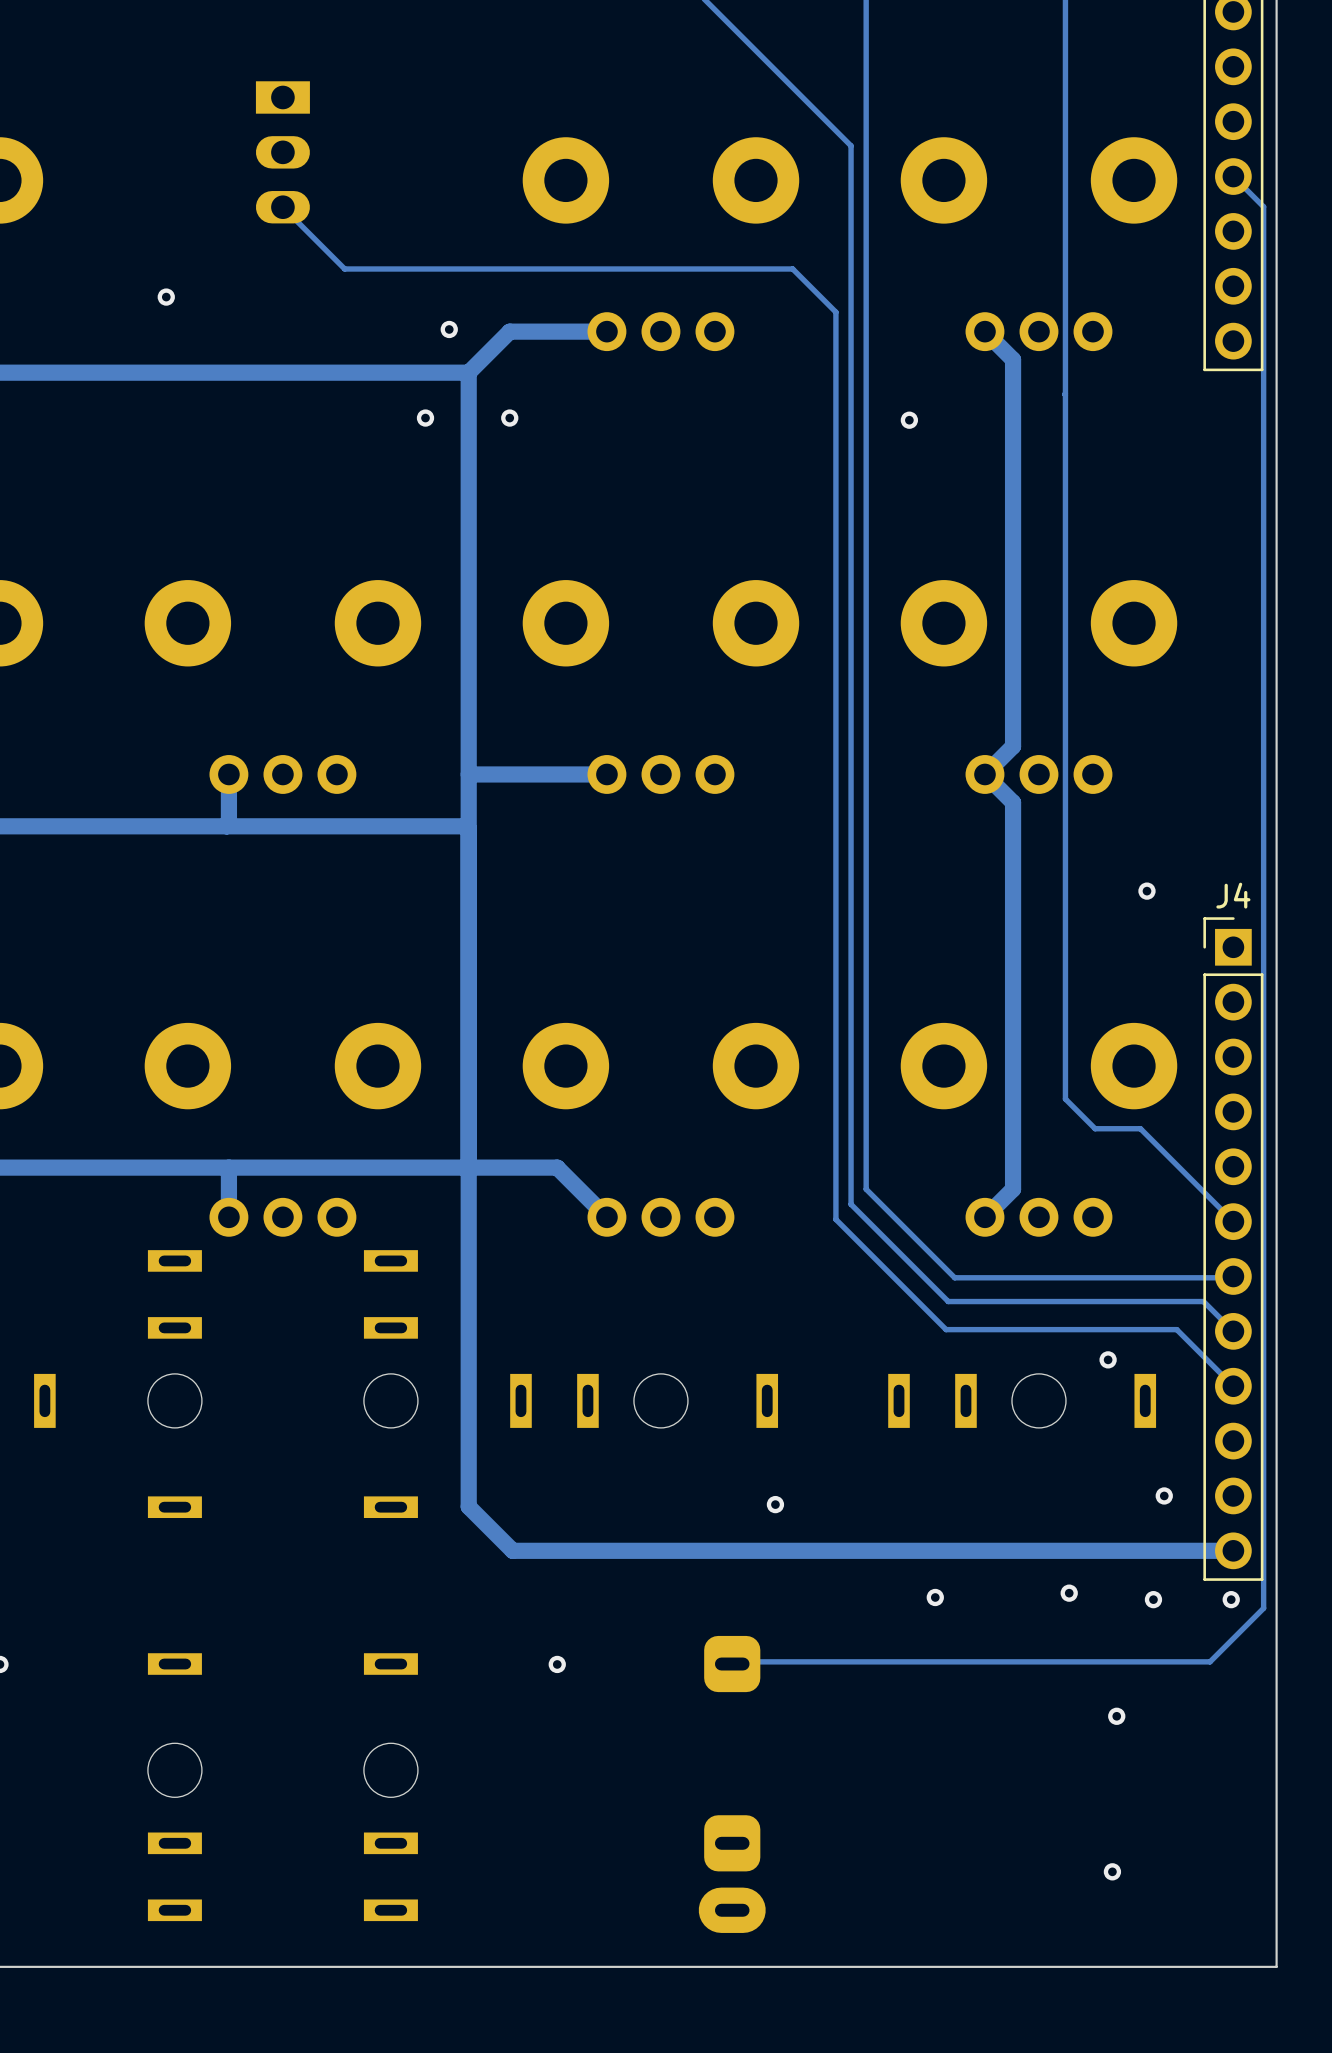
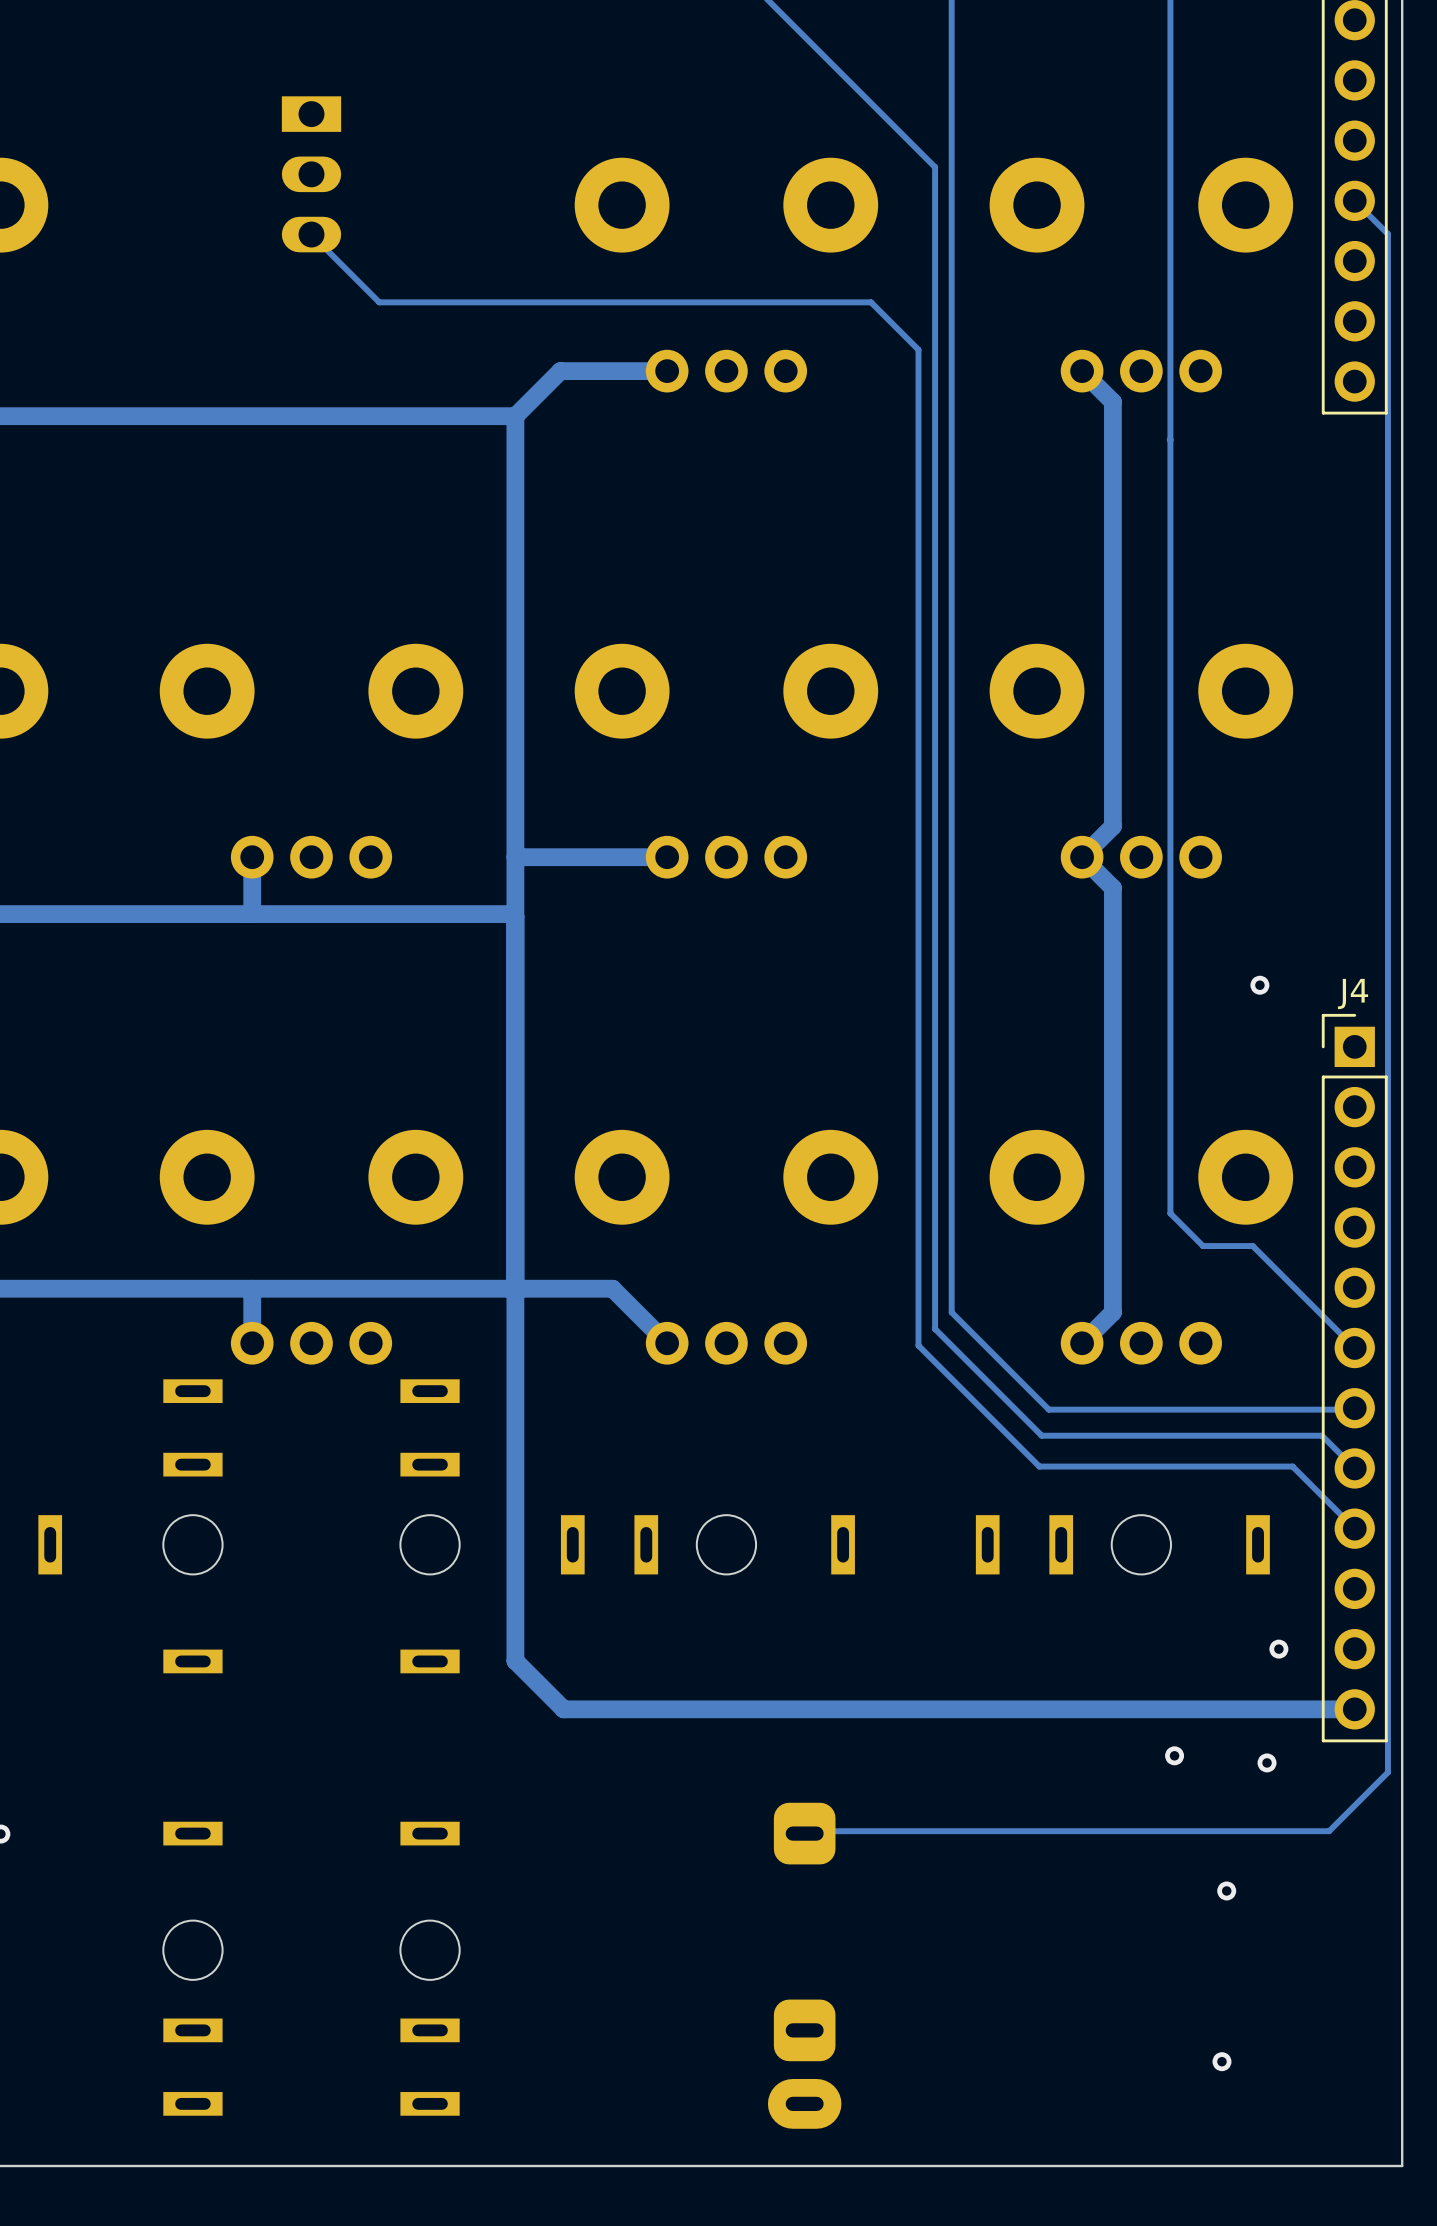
via: (166, 297) -> none
via: (449, 329) -> none
via: (425, 418) -> none
via: (509, 418) -> none
via: (909, 420) -> none
via: (1108, 1359) -> none
via: (775, 1504) -> none
via: (935, 1597) -> none
via: (1231, 1599) -> none
via: (557, 1664) -> none

